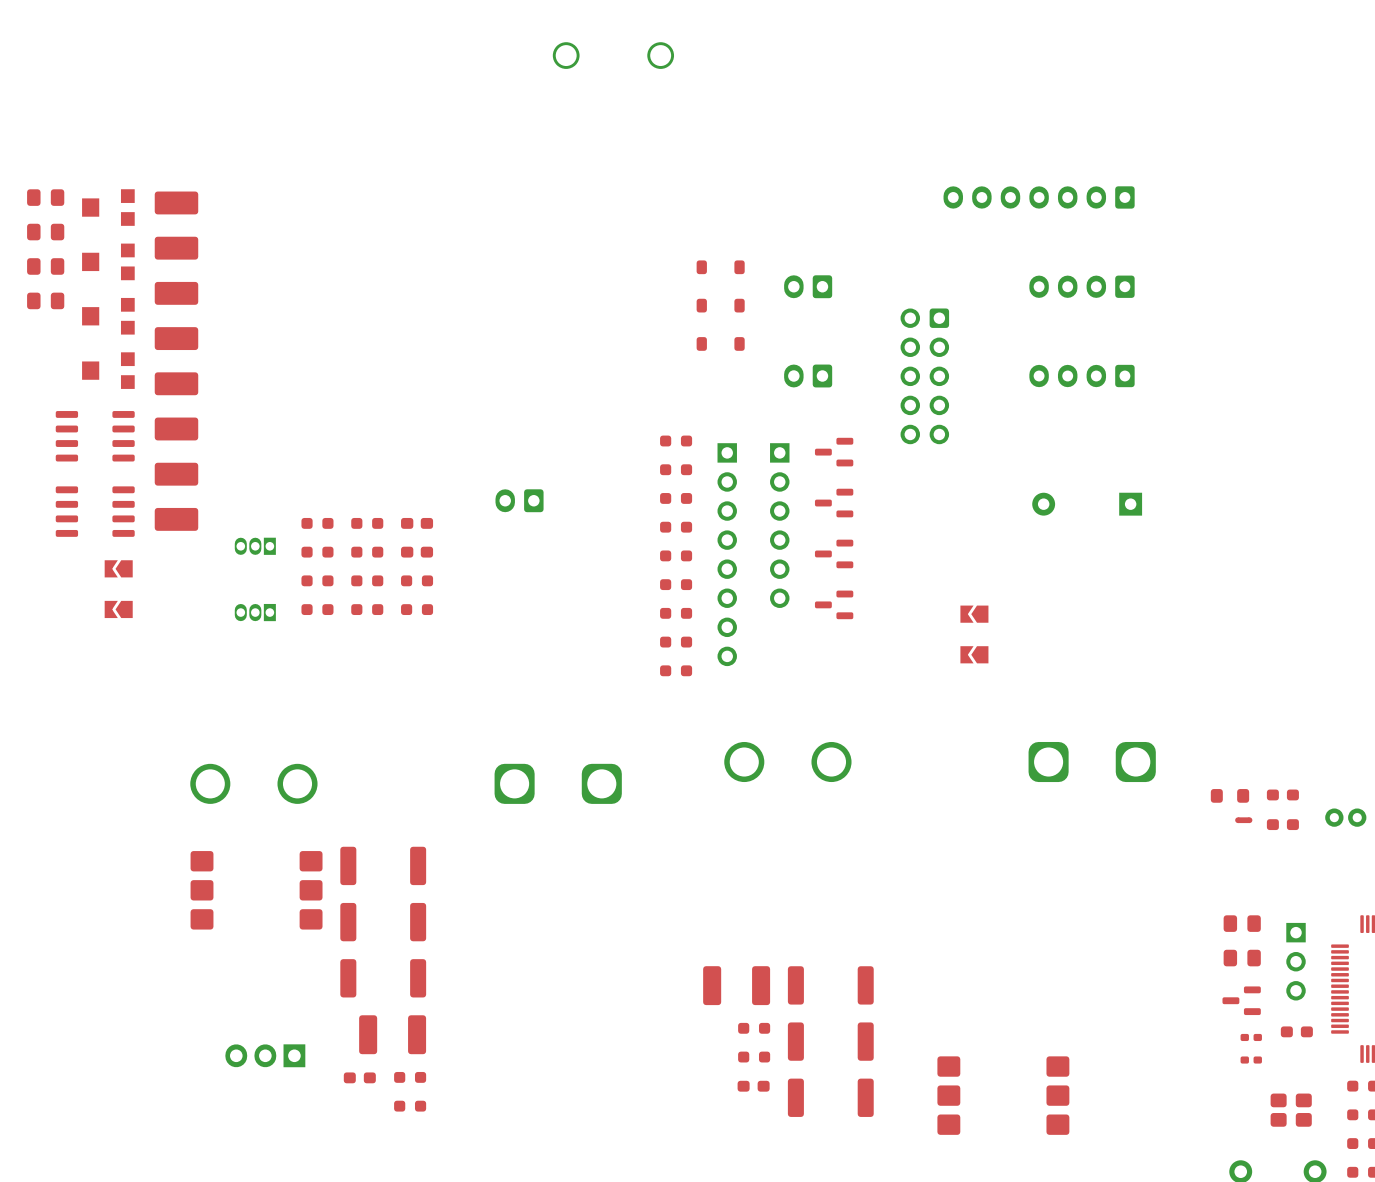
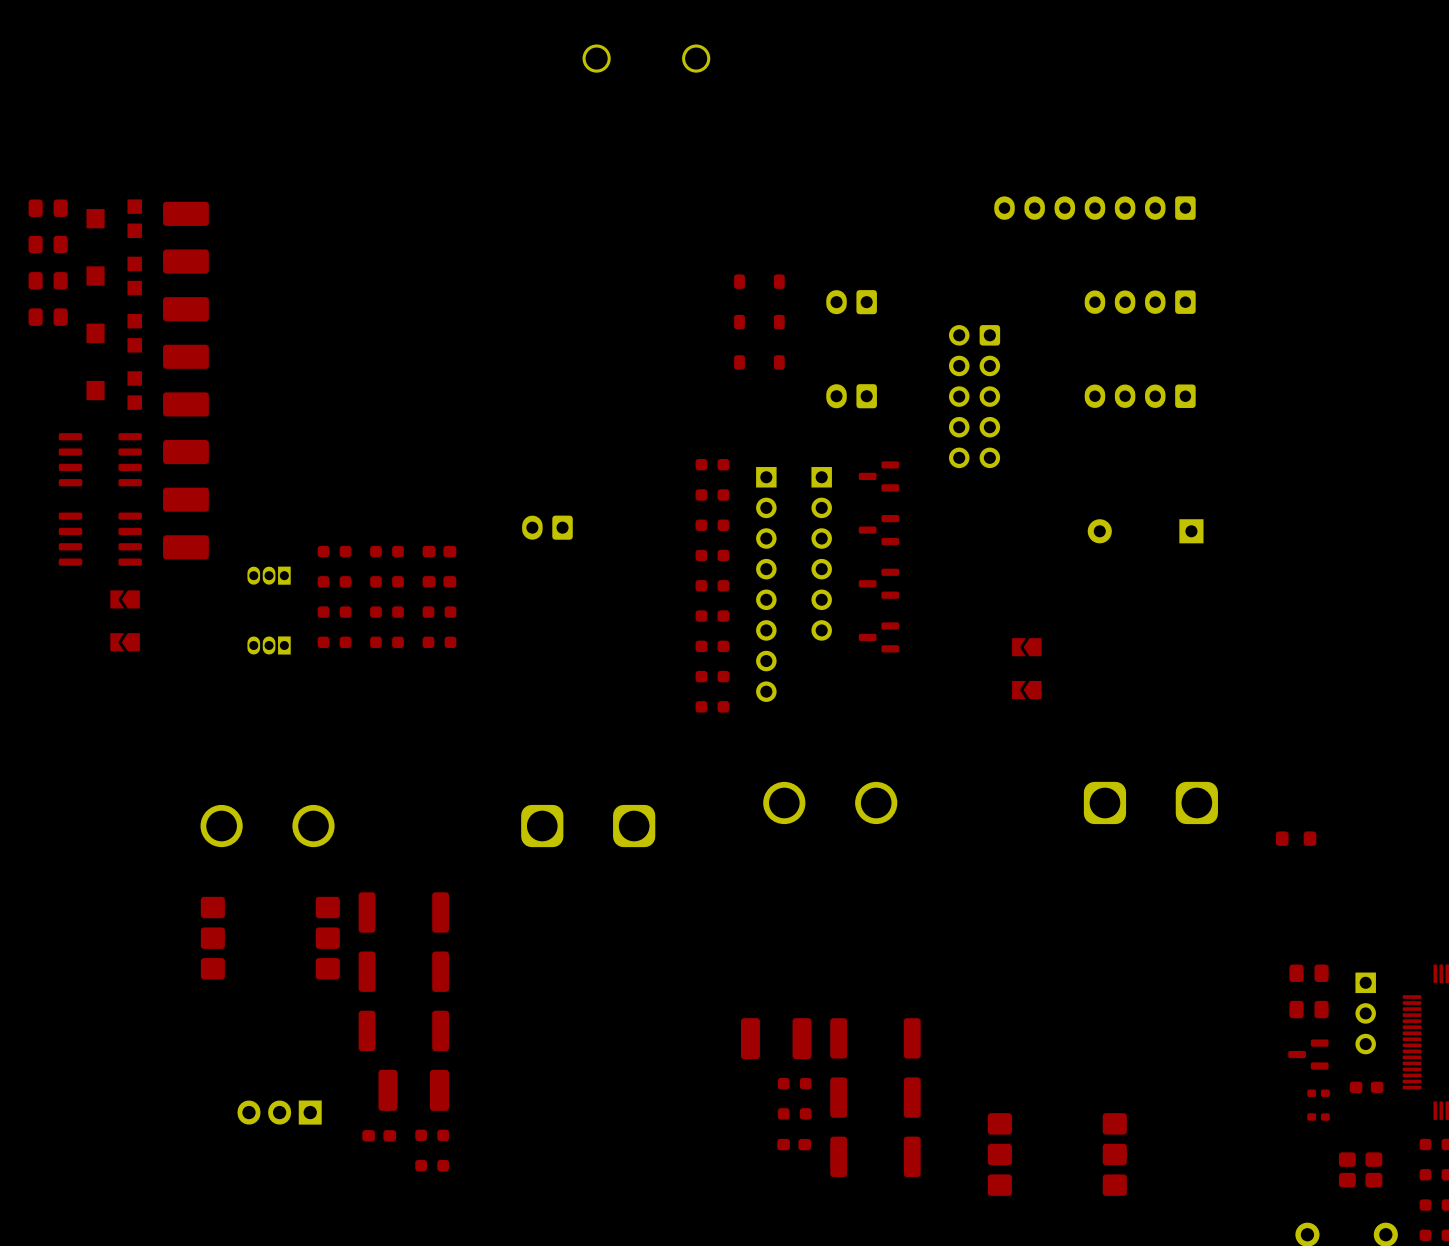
part: (1282, 794) -> none
part: (1345, 817) -> none
part: (1243, 820) -> none
part: (1282, 824) -> none

